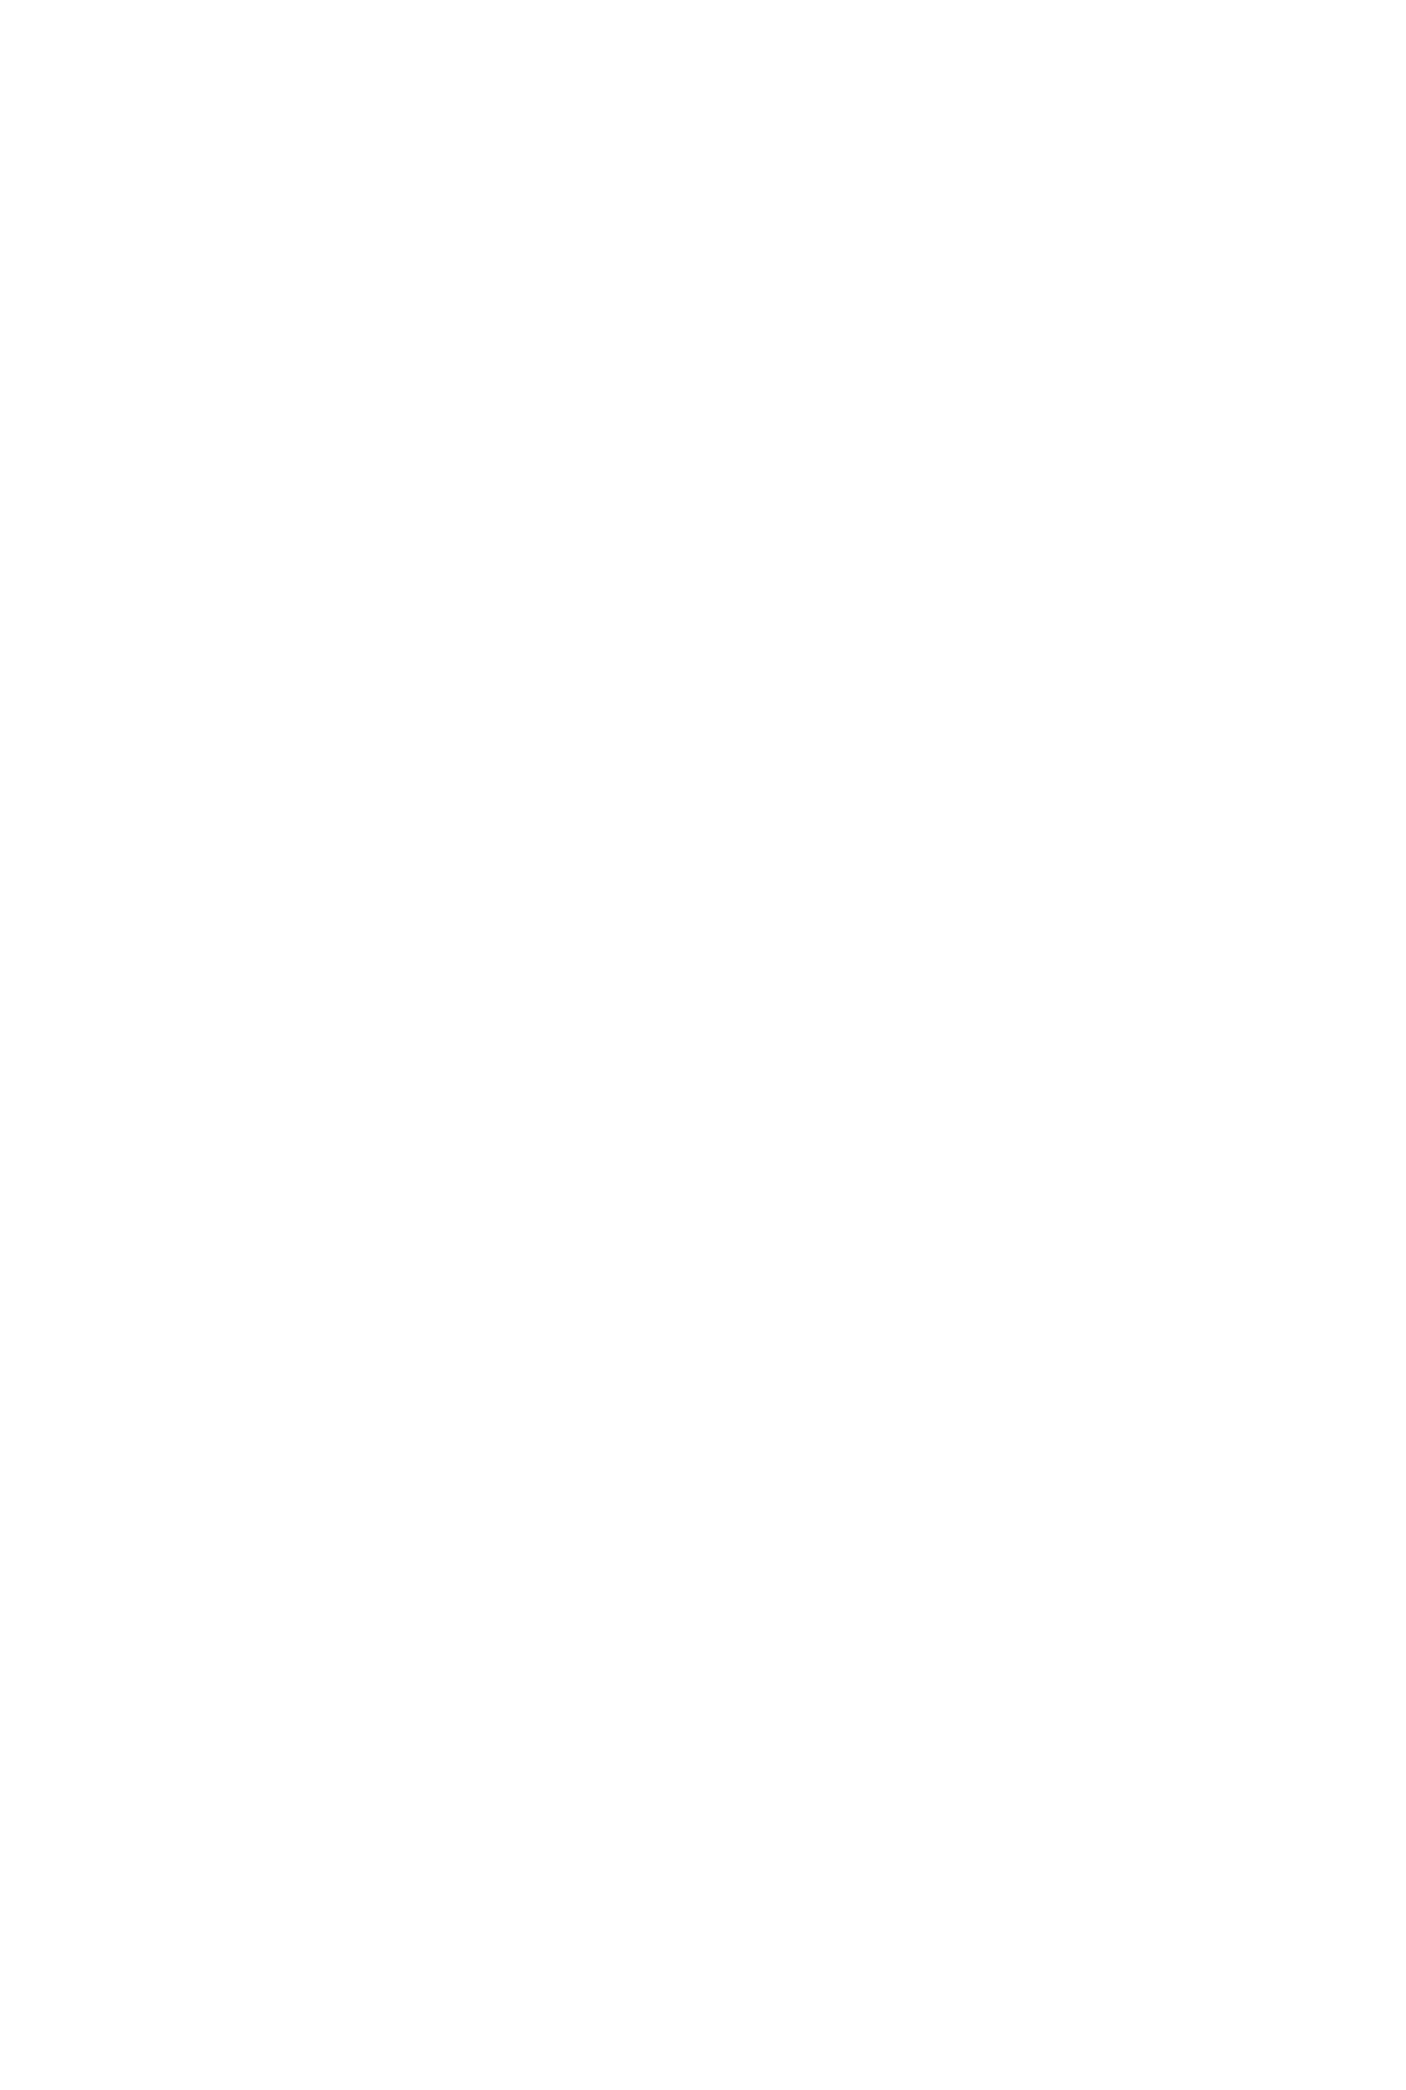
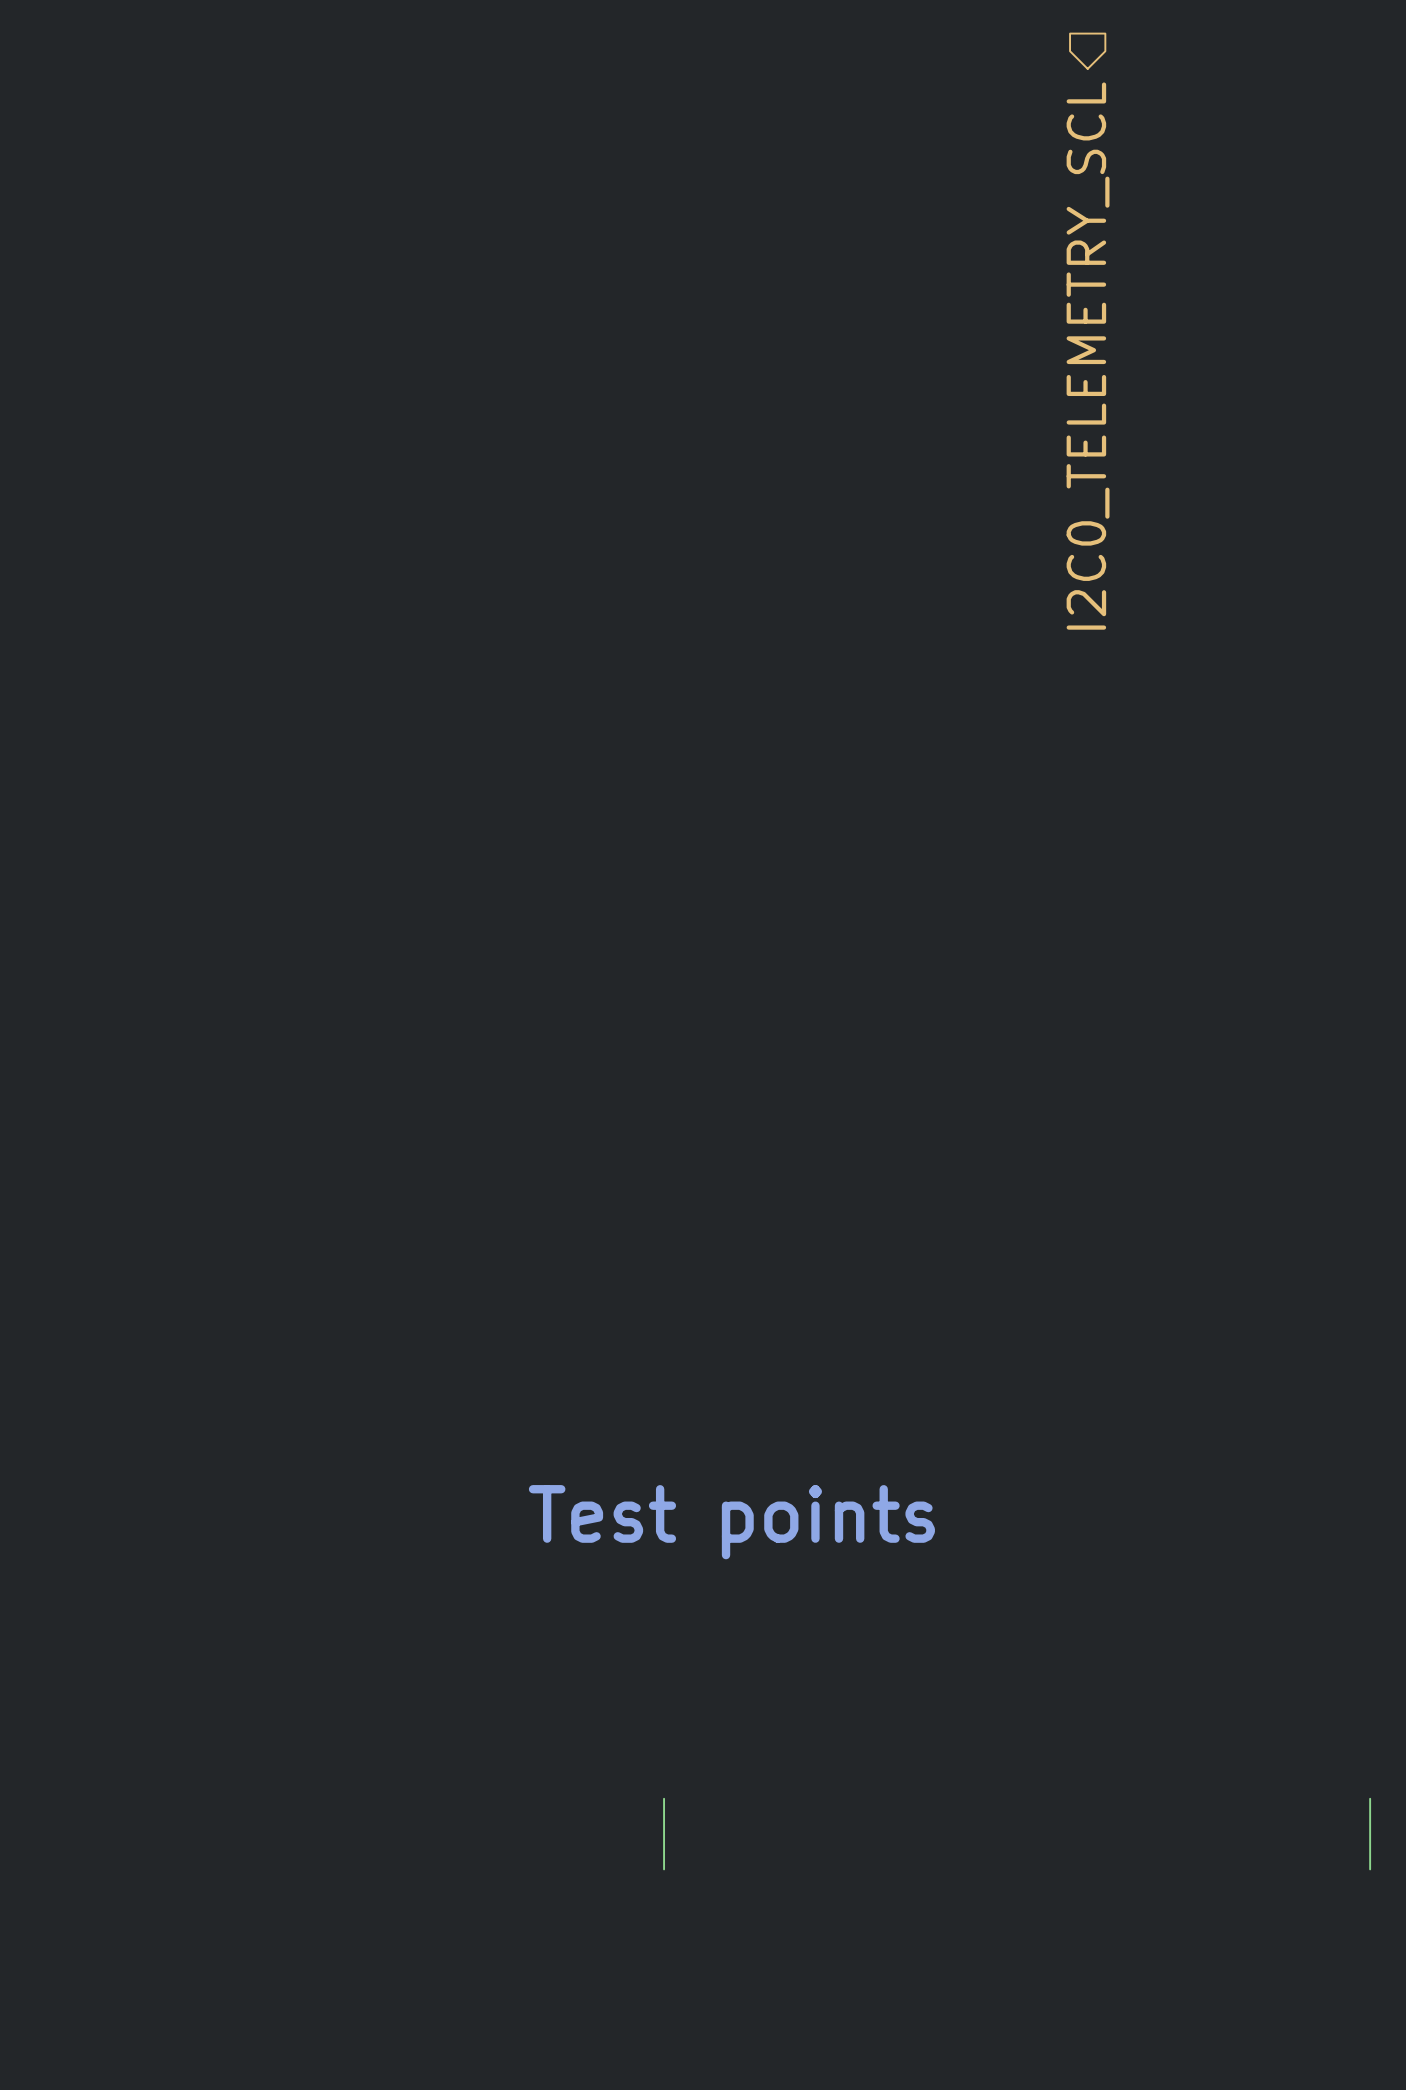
hierarchical label: none -> I2C0_TELEMETRY_SCL (1088, 356)
text: none -> Test points (731, 1522)
wire: none -> (664, 1798) (664, 1869)
wire: none -> (1370, 1798) (1370, 1869)

